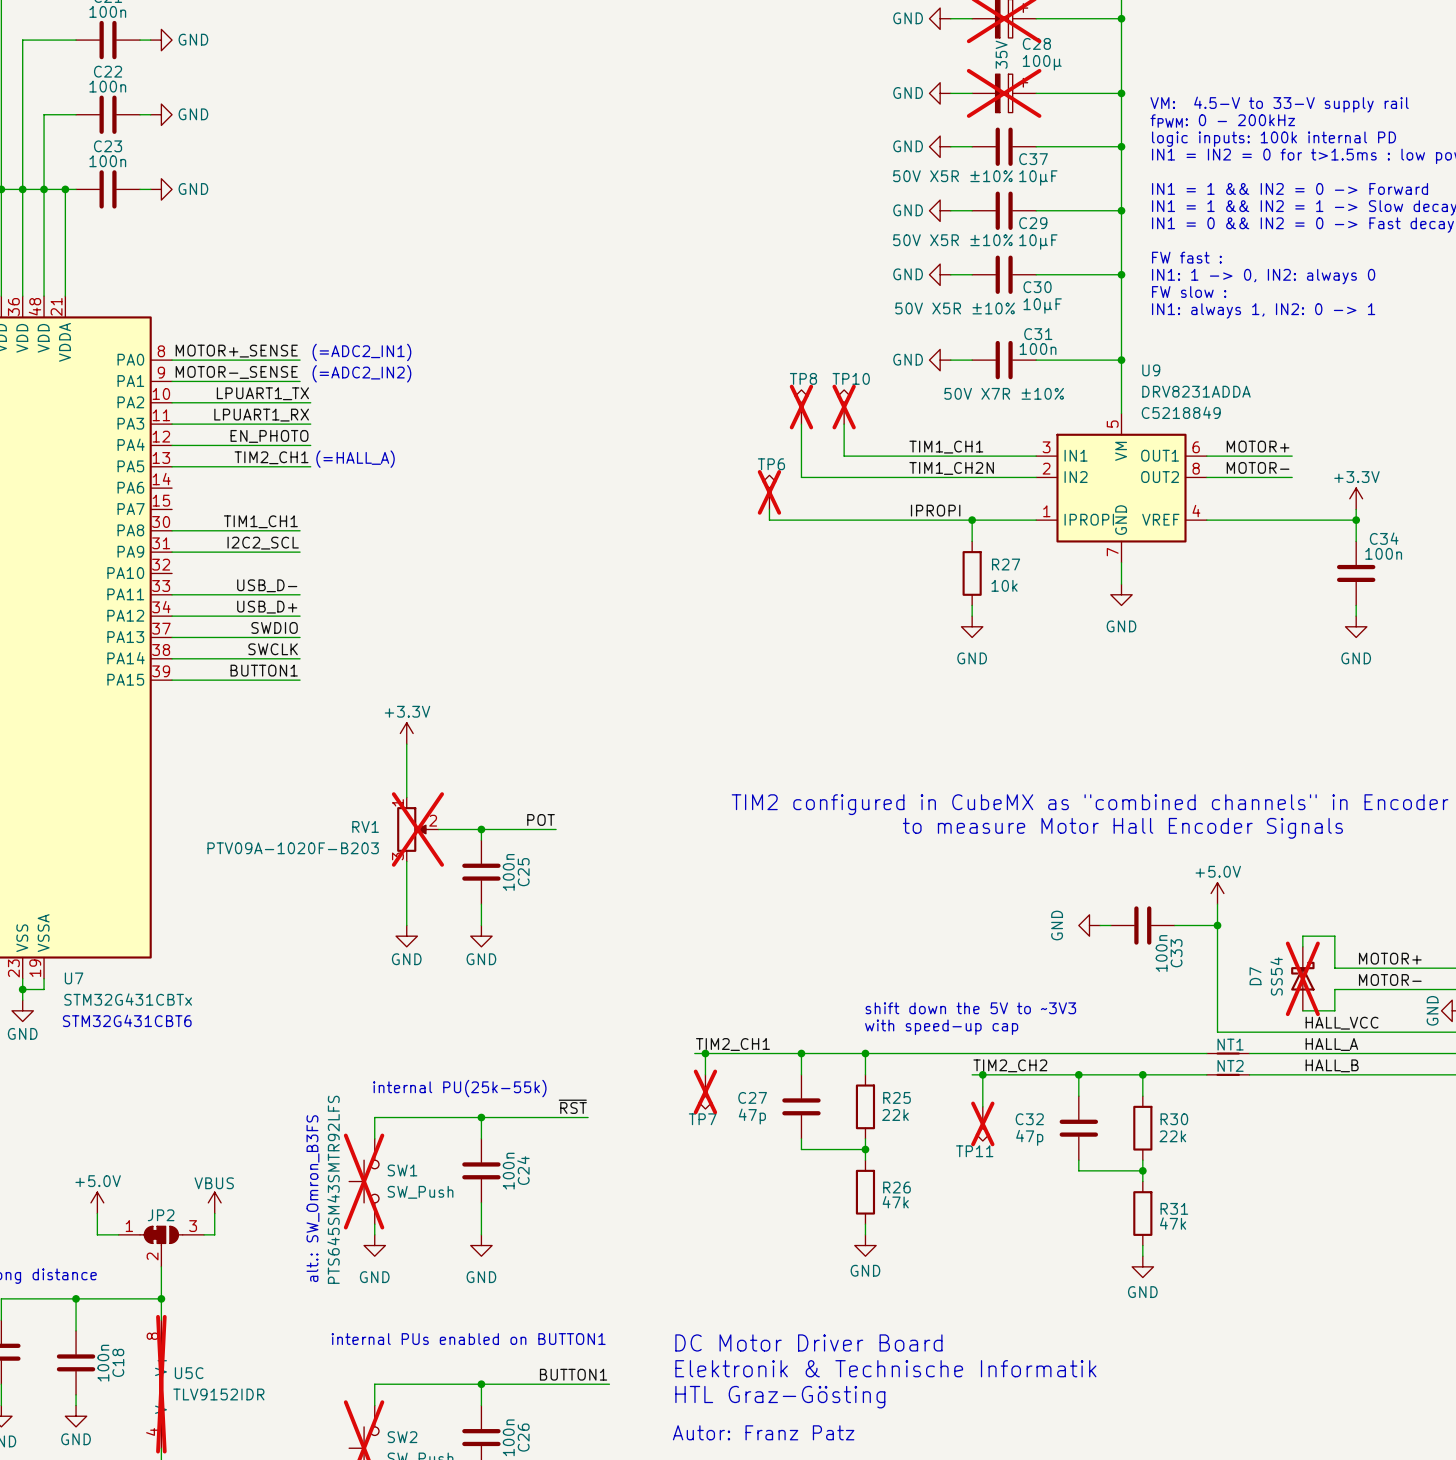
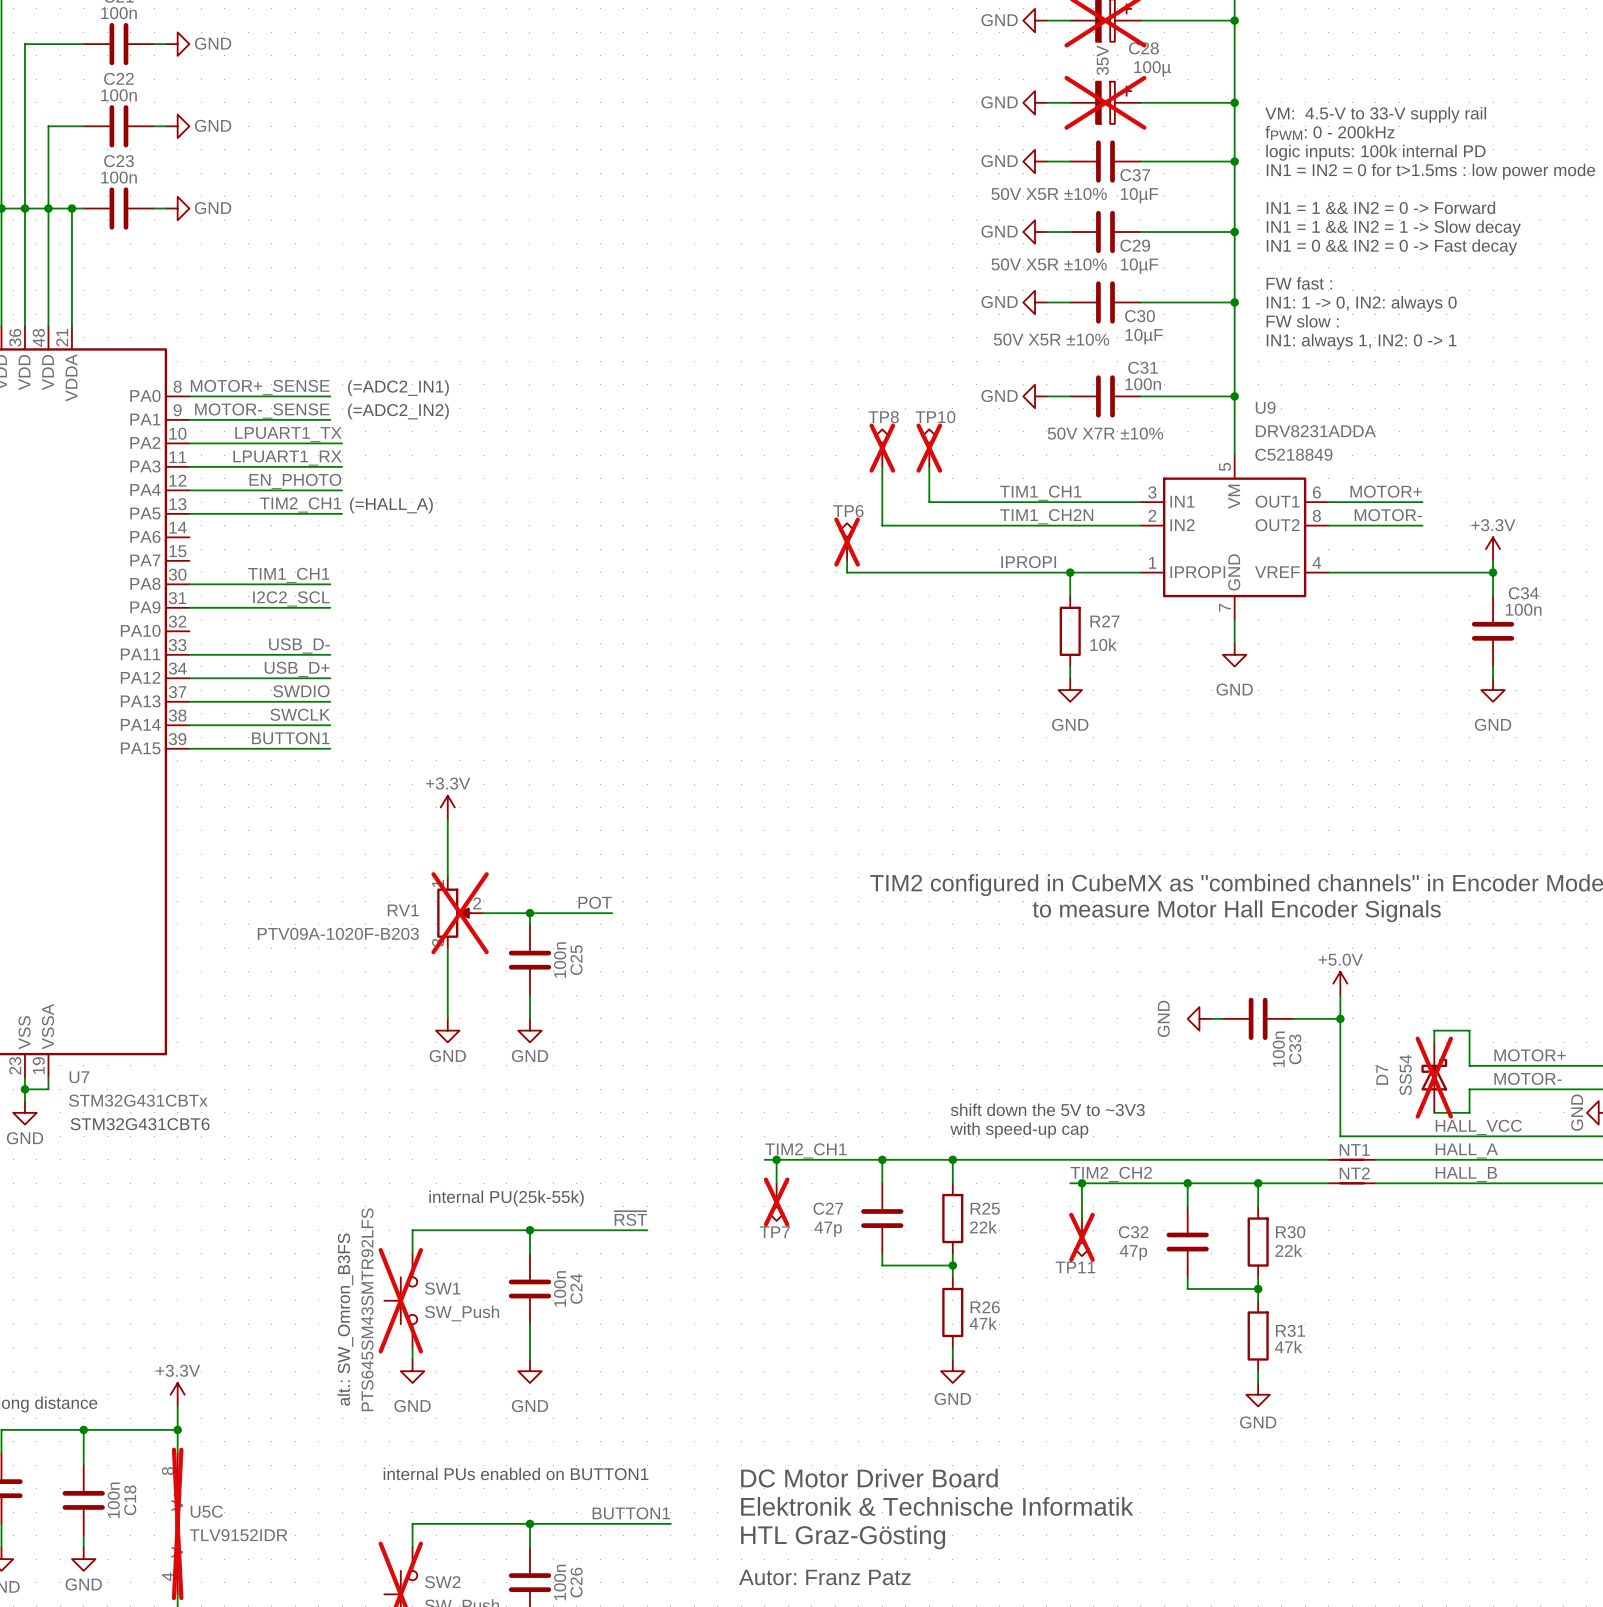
power symbol: +5.0V (97, 1202) -> none
power symbol: VBUS (214, 1202) -> none
wire: (97, 1213) (97, 1234) (118, 1234) -> none
wire: (214, 1213) (214, 1234) (204, 1234) -> none
JP2: (161, 1246) -> none
power symbol: none -> +3.3V (177, 1394)

